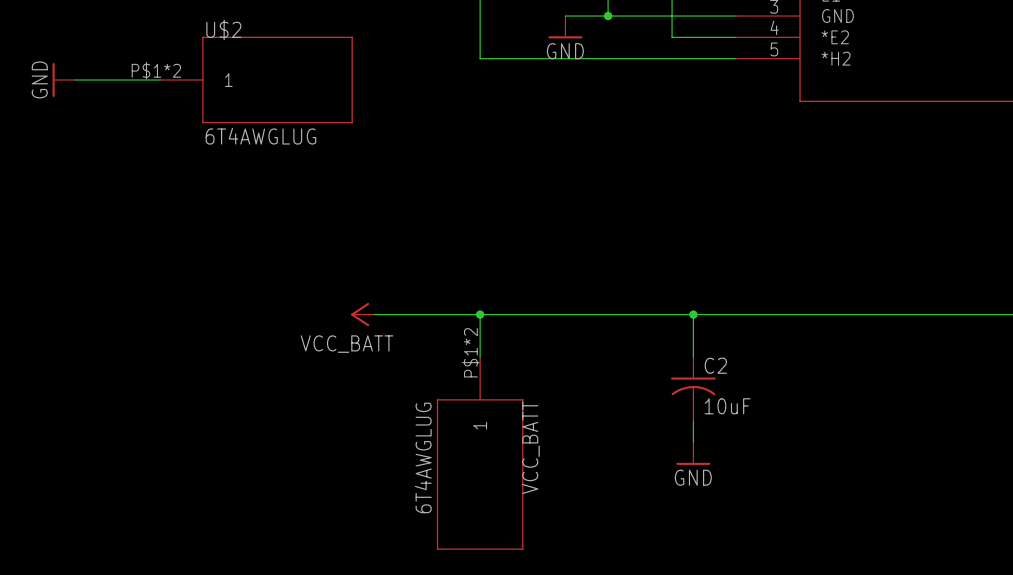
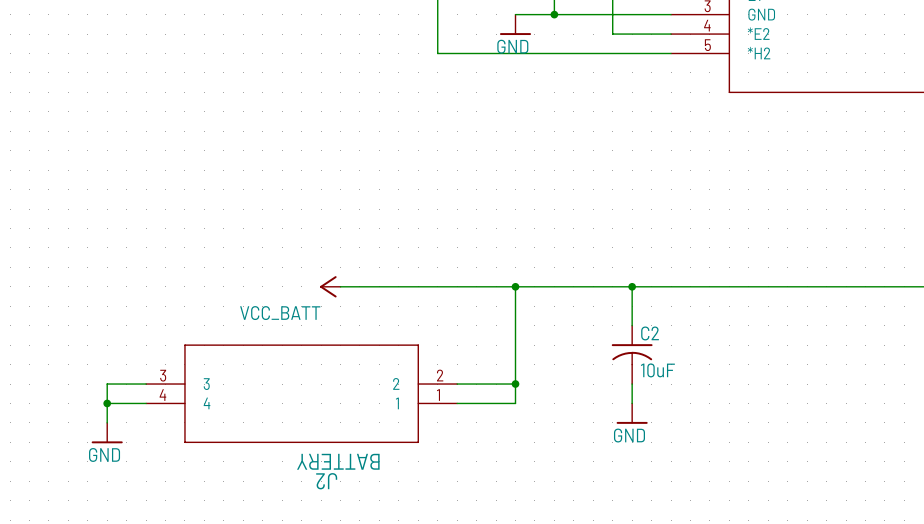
power symbol: GND (63, 80) -> none
wire: (74, 80) (160, 80) -> none
U$2: 6T4AWGLUG (256, 80) -> none
wire: (480, 314) (480, 357) -> none
junction: (480, 314) -> none
wire: none -> (515, 286) (515, 403) (457, 403)
junction: none -> (515, 286)
power symbol text position: VCC_BATT (347, 344) -> VCC_BATT (280, 313)
wire: none -> (146, 384) (107, 384) (107, 422)
wire: none -> (457, 384) (515, 384)
junction: none -> (515, 384)
J2: none -> BATTERY (301, 393)
wire: none -> (107, 403) (146, 403)
junction: none -> (107, 403)
VCC_BATT: 6T4AWGLUG (480, 453) -> none
power symbol: none -> GND (107, 433)

